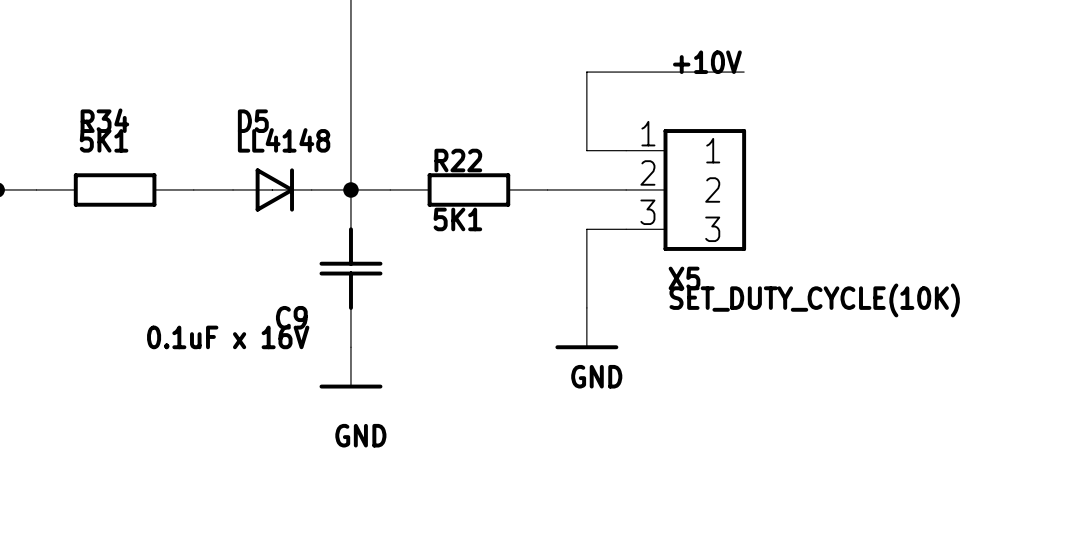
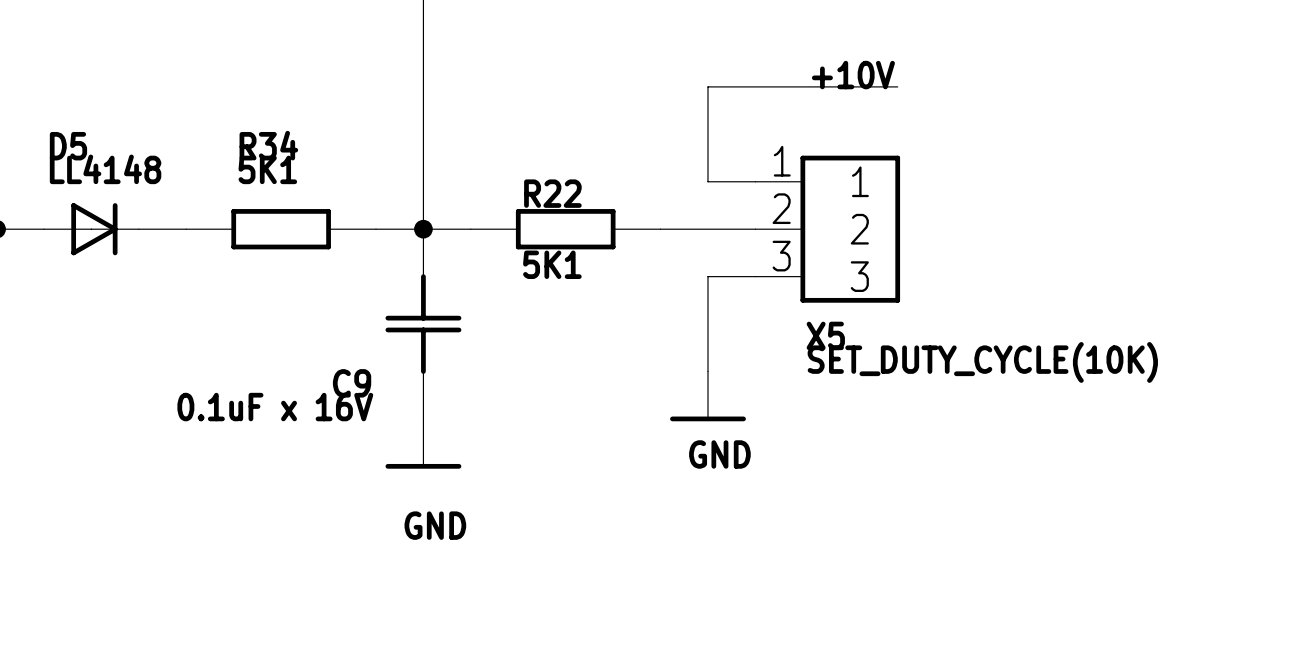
R34 position: (115, 189) -> (281, 229)
wire: (193, 189) (233, 189) -> (138, 229) (186, 229)
D5 position: (272, 189) -> (91, 229)

